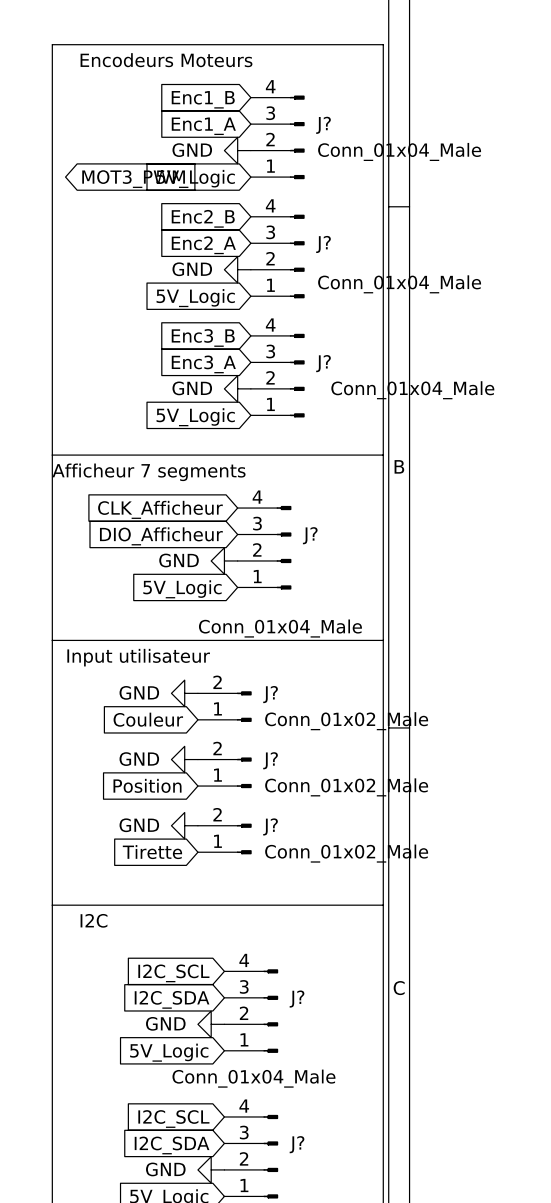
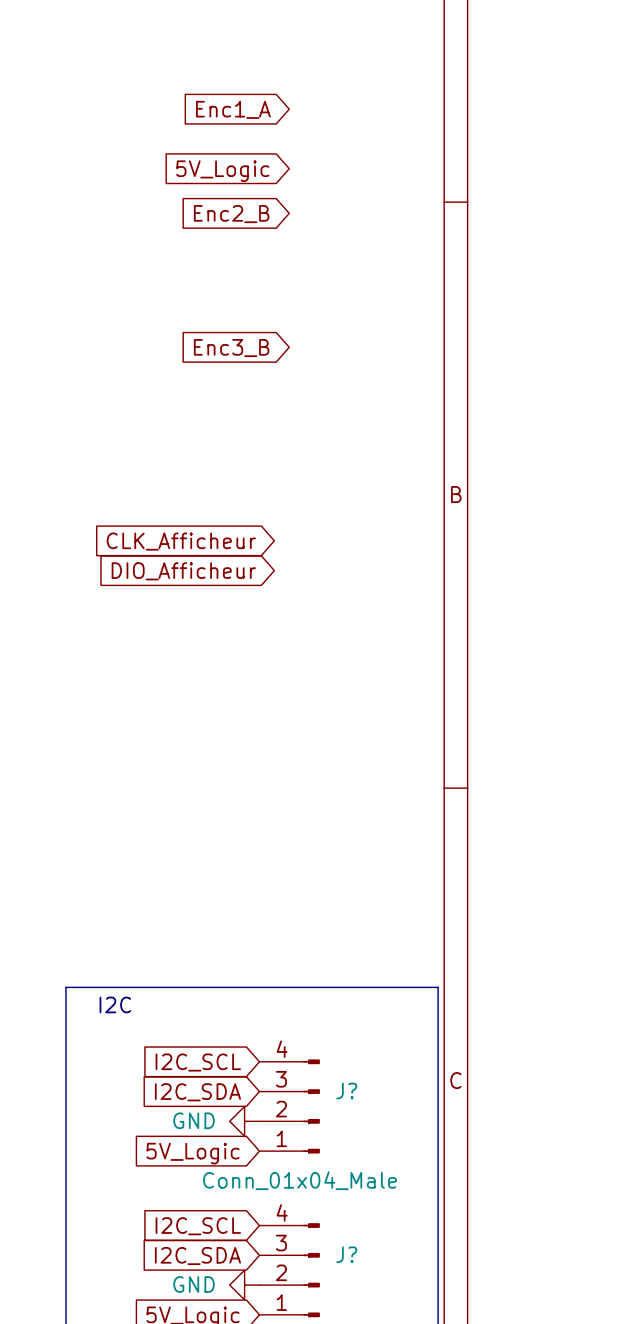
text: Encodeurs Moteurs (166, 60) -> none
global label: Enc1_B (203, 99) -> none
J?: Conn_01x04_Male (277, 137) -> none
power symbol: GND (237, 150) -> none
global label: MOT3_PWM (133, 179) -> none
global label: Enc2_A (203, 245) -> none
J?: Conn_01x04_Male (277, 256) -> none
power symbol: GND (237, 269) -> none
global label: 5V_Logic (195, 298) -> none
global label: Enc3_A (203, 364) -> none
J?: Conn_01x04_Male (277, 375) -> none
power symbol: GND (237, 388) -> none
global label: 5V_Logic (195, 417) -> none
line: (52, 455) (383, 455) -> none
text: Afficheur 7 segments (149, 472) -> none
J?: Conn_01x04_Male (264, 547) -> none
power symbol: GND (224, 560) -> none
global label: 5V_Logic (182, 589) -> none
line: (52, 640) (383, 640) -> none
text: Input utilisateur (138, 657) -> none
power symbol: GND (184, 693) -> none
J?: Conn_01x02_Male (224, 706) -> none
global label: Couleur (148, 719) -> none
power symbol: GND (184, 759) -> none
J?: Conn_01x02_Male (224, 772) -> none
global label: Position (147, 785) -> none
power symbol: GND (184, 825) -> none
J?: Conn_01x02_Male (224, 838) -> none
global label: Tirette (152, 852) -> none
line: (52, 905) (52, 44) (383, 44) (383, 905) -> none

